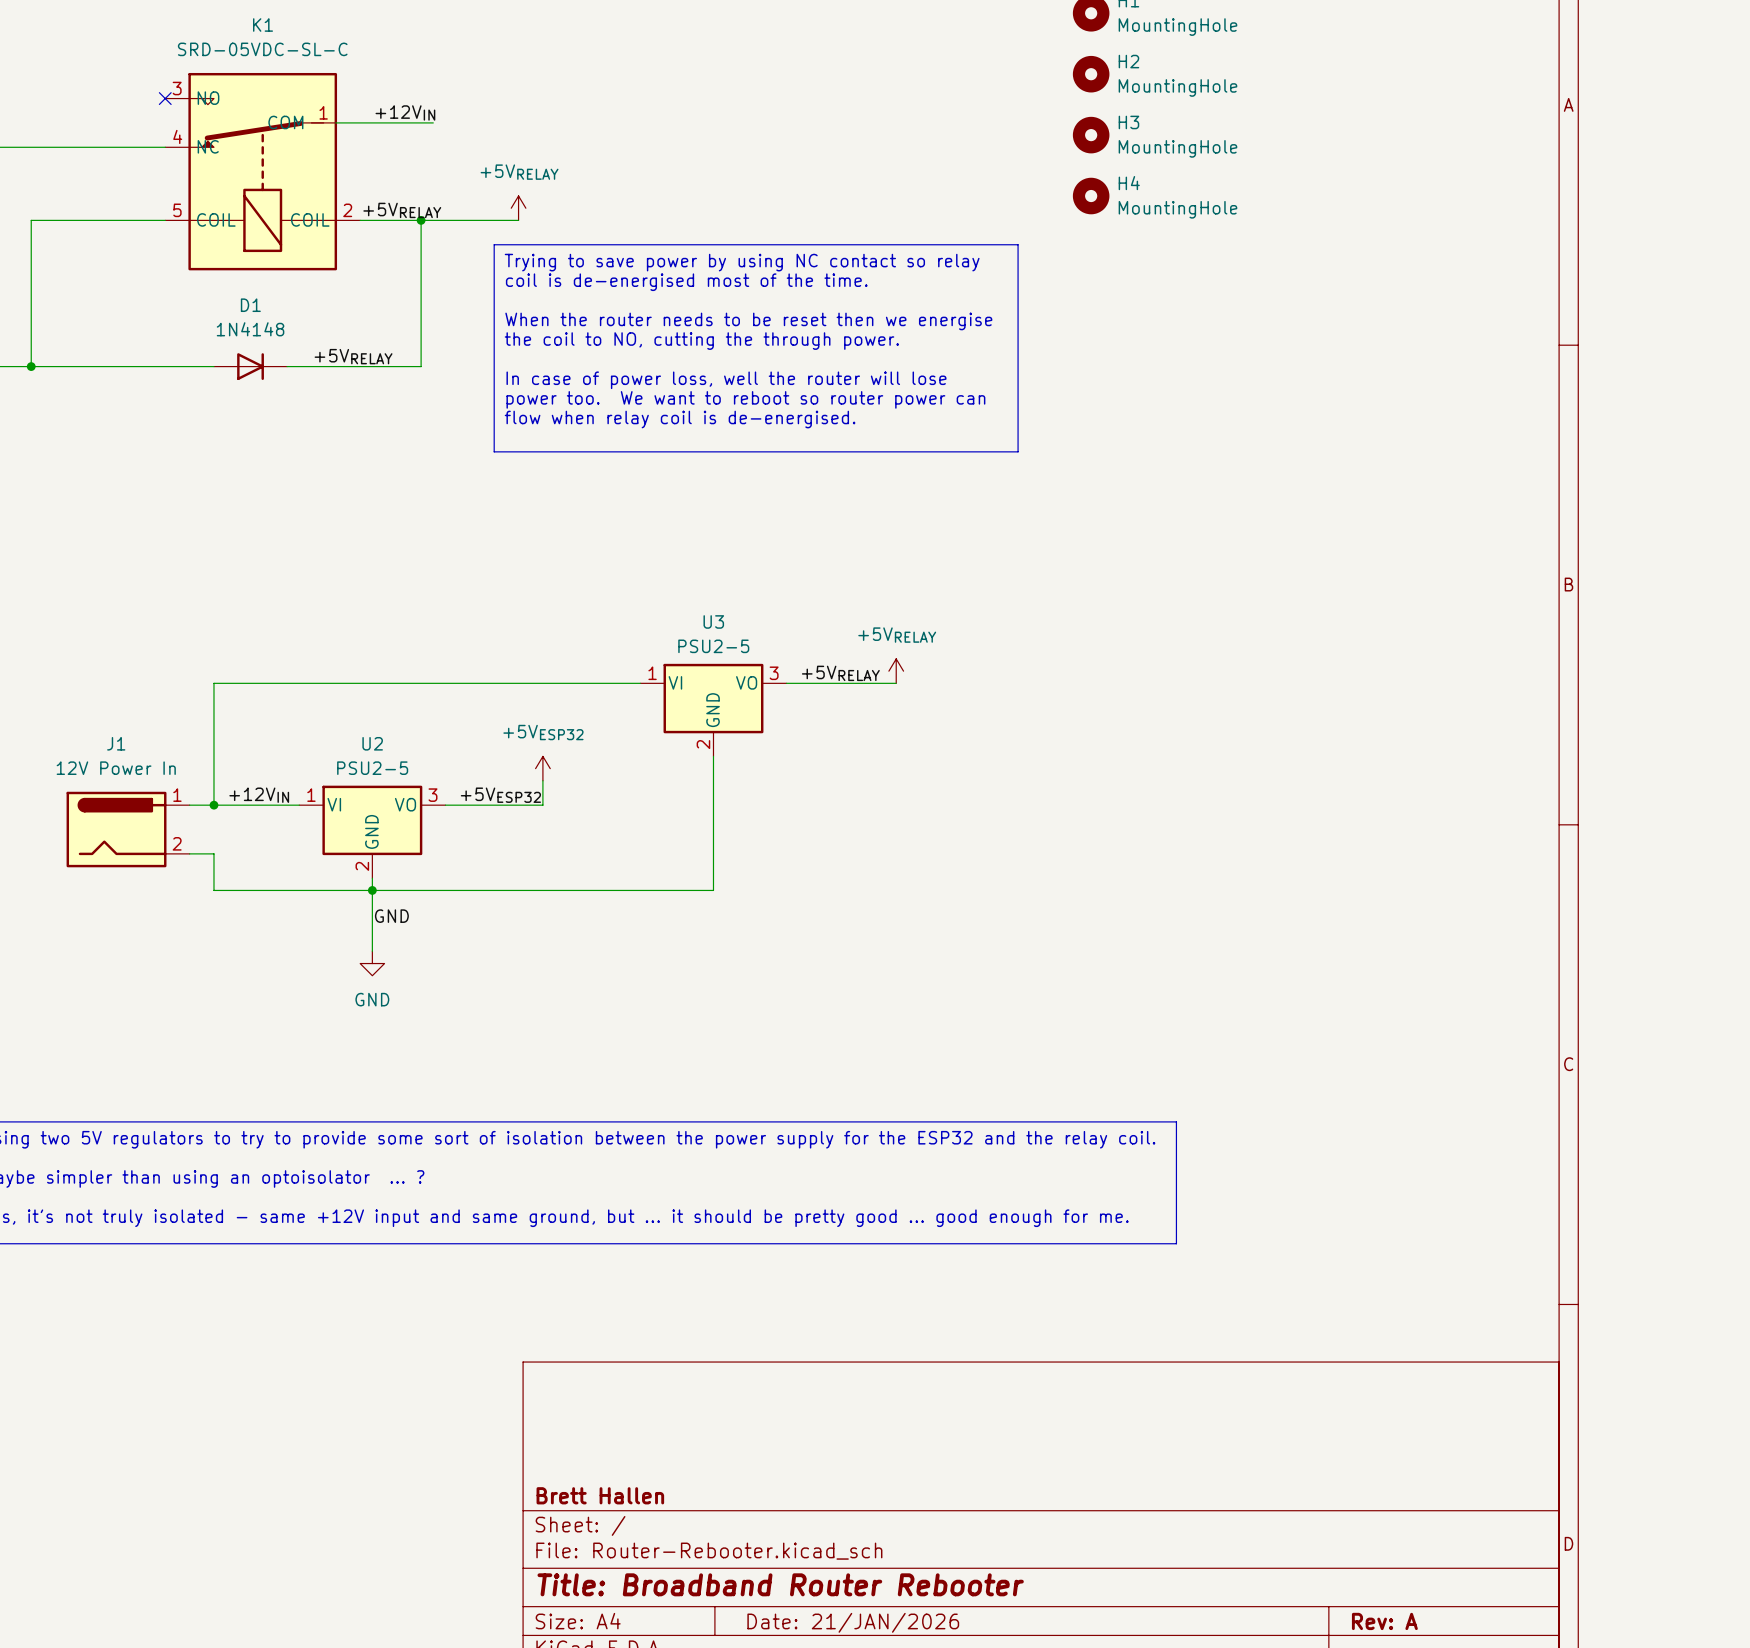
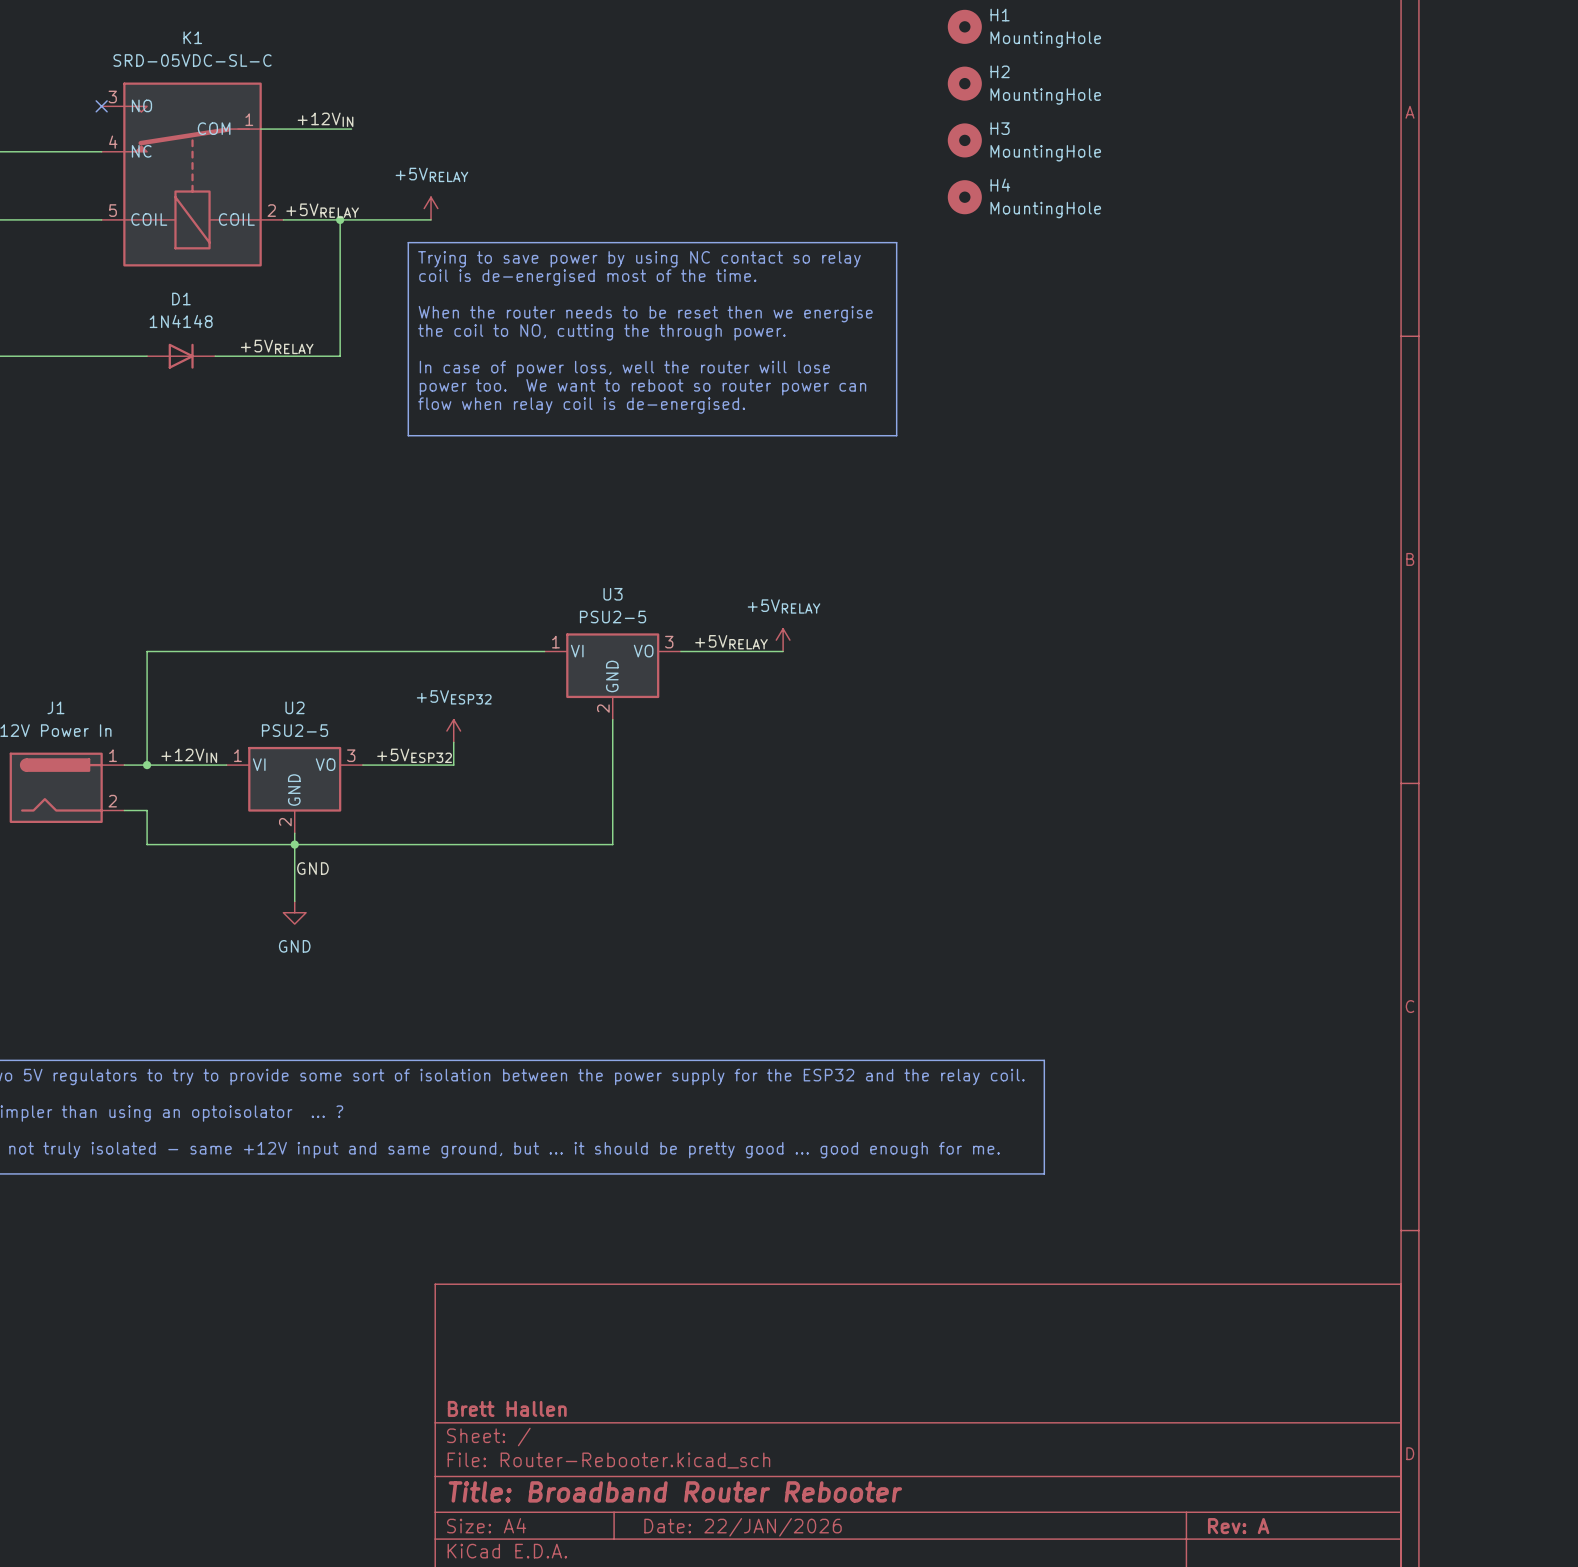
title block: Date: 21/JAN/2026 (853, 1622) -> Date: 22/JAN/2026 (743, 1527)

